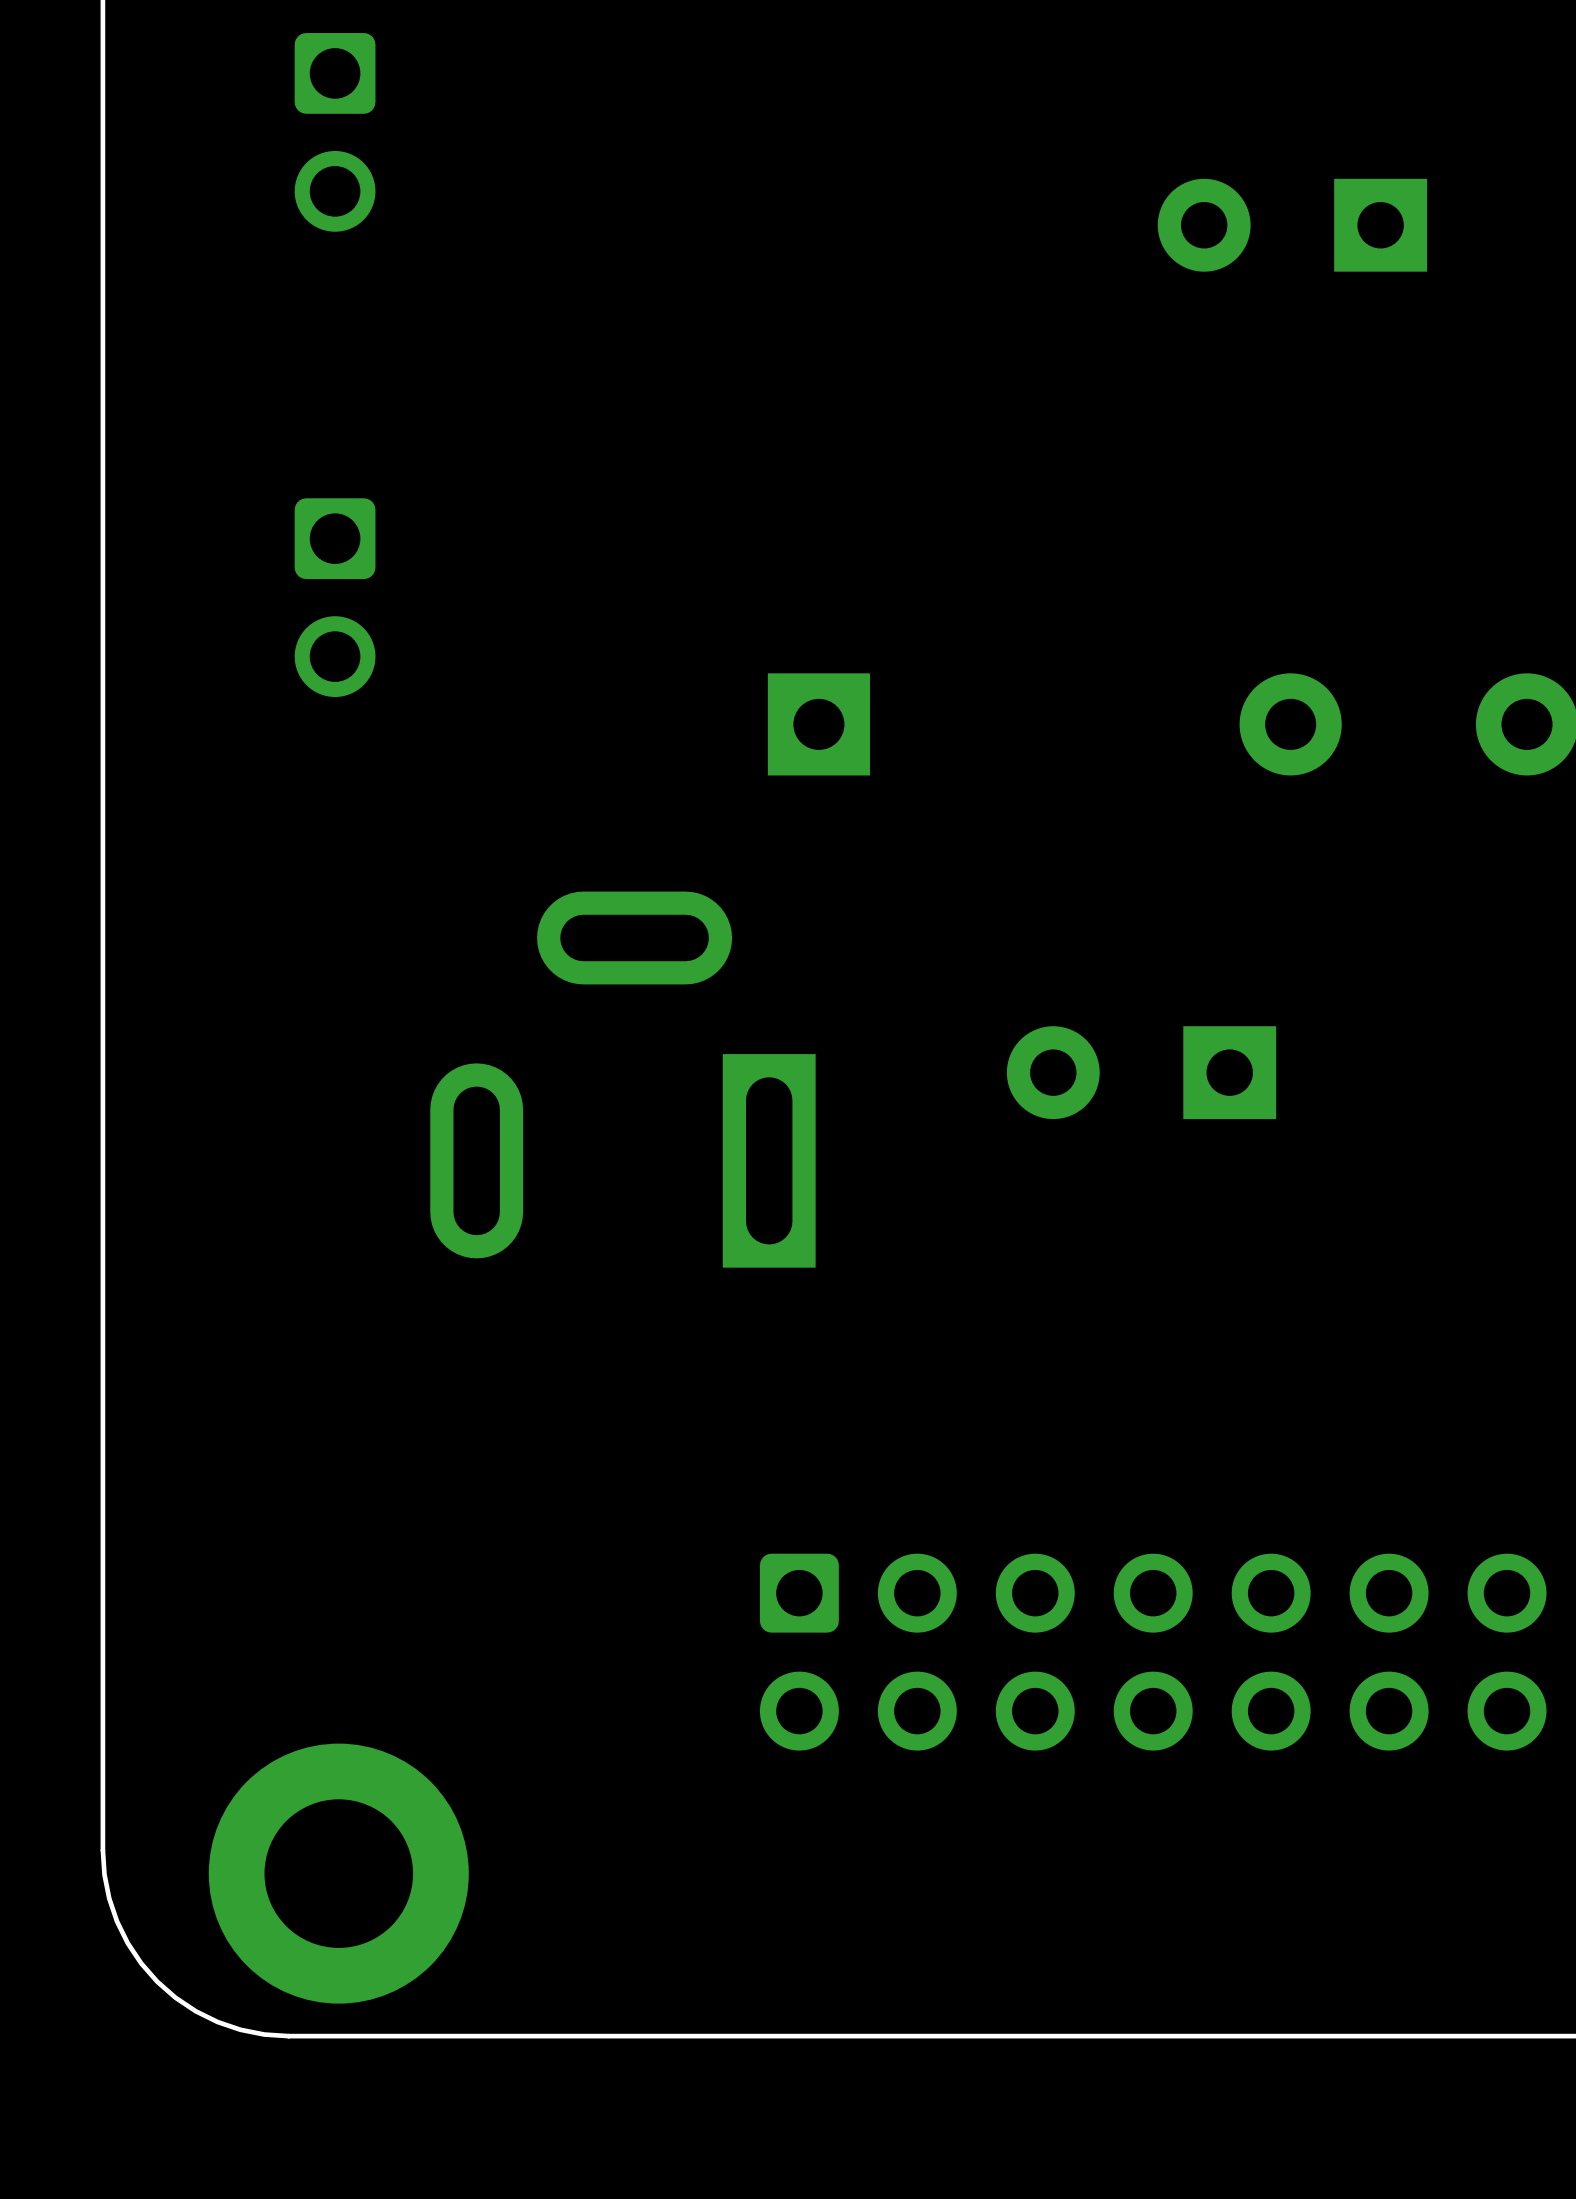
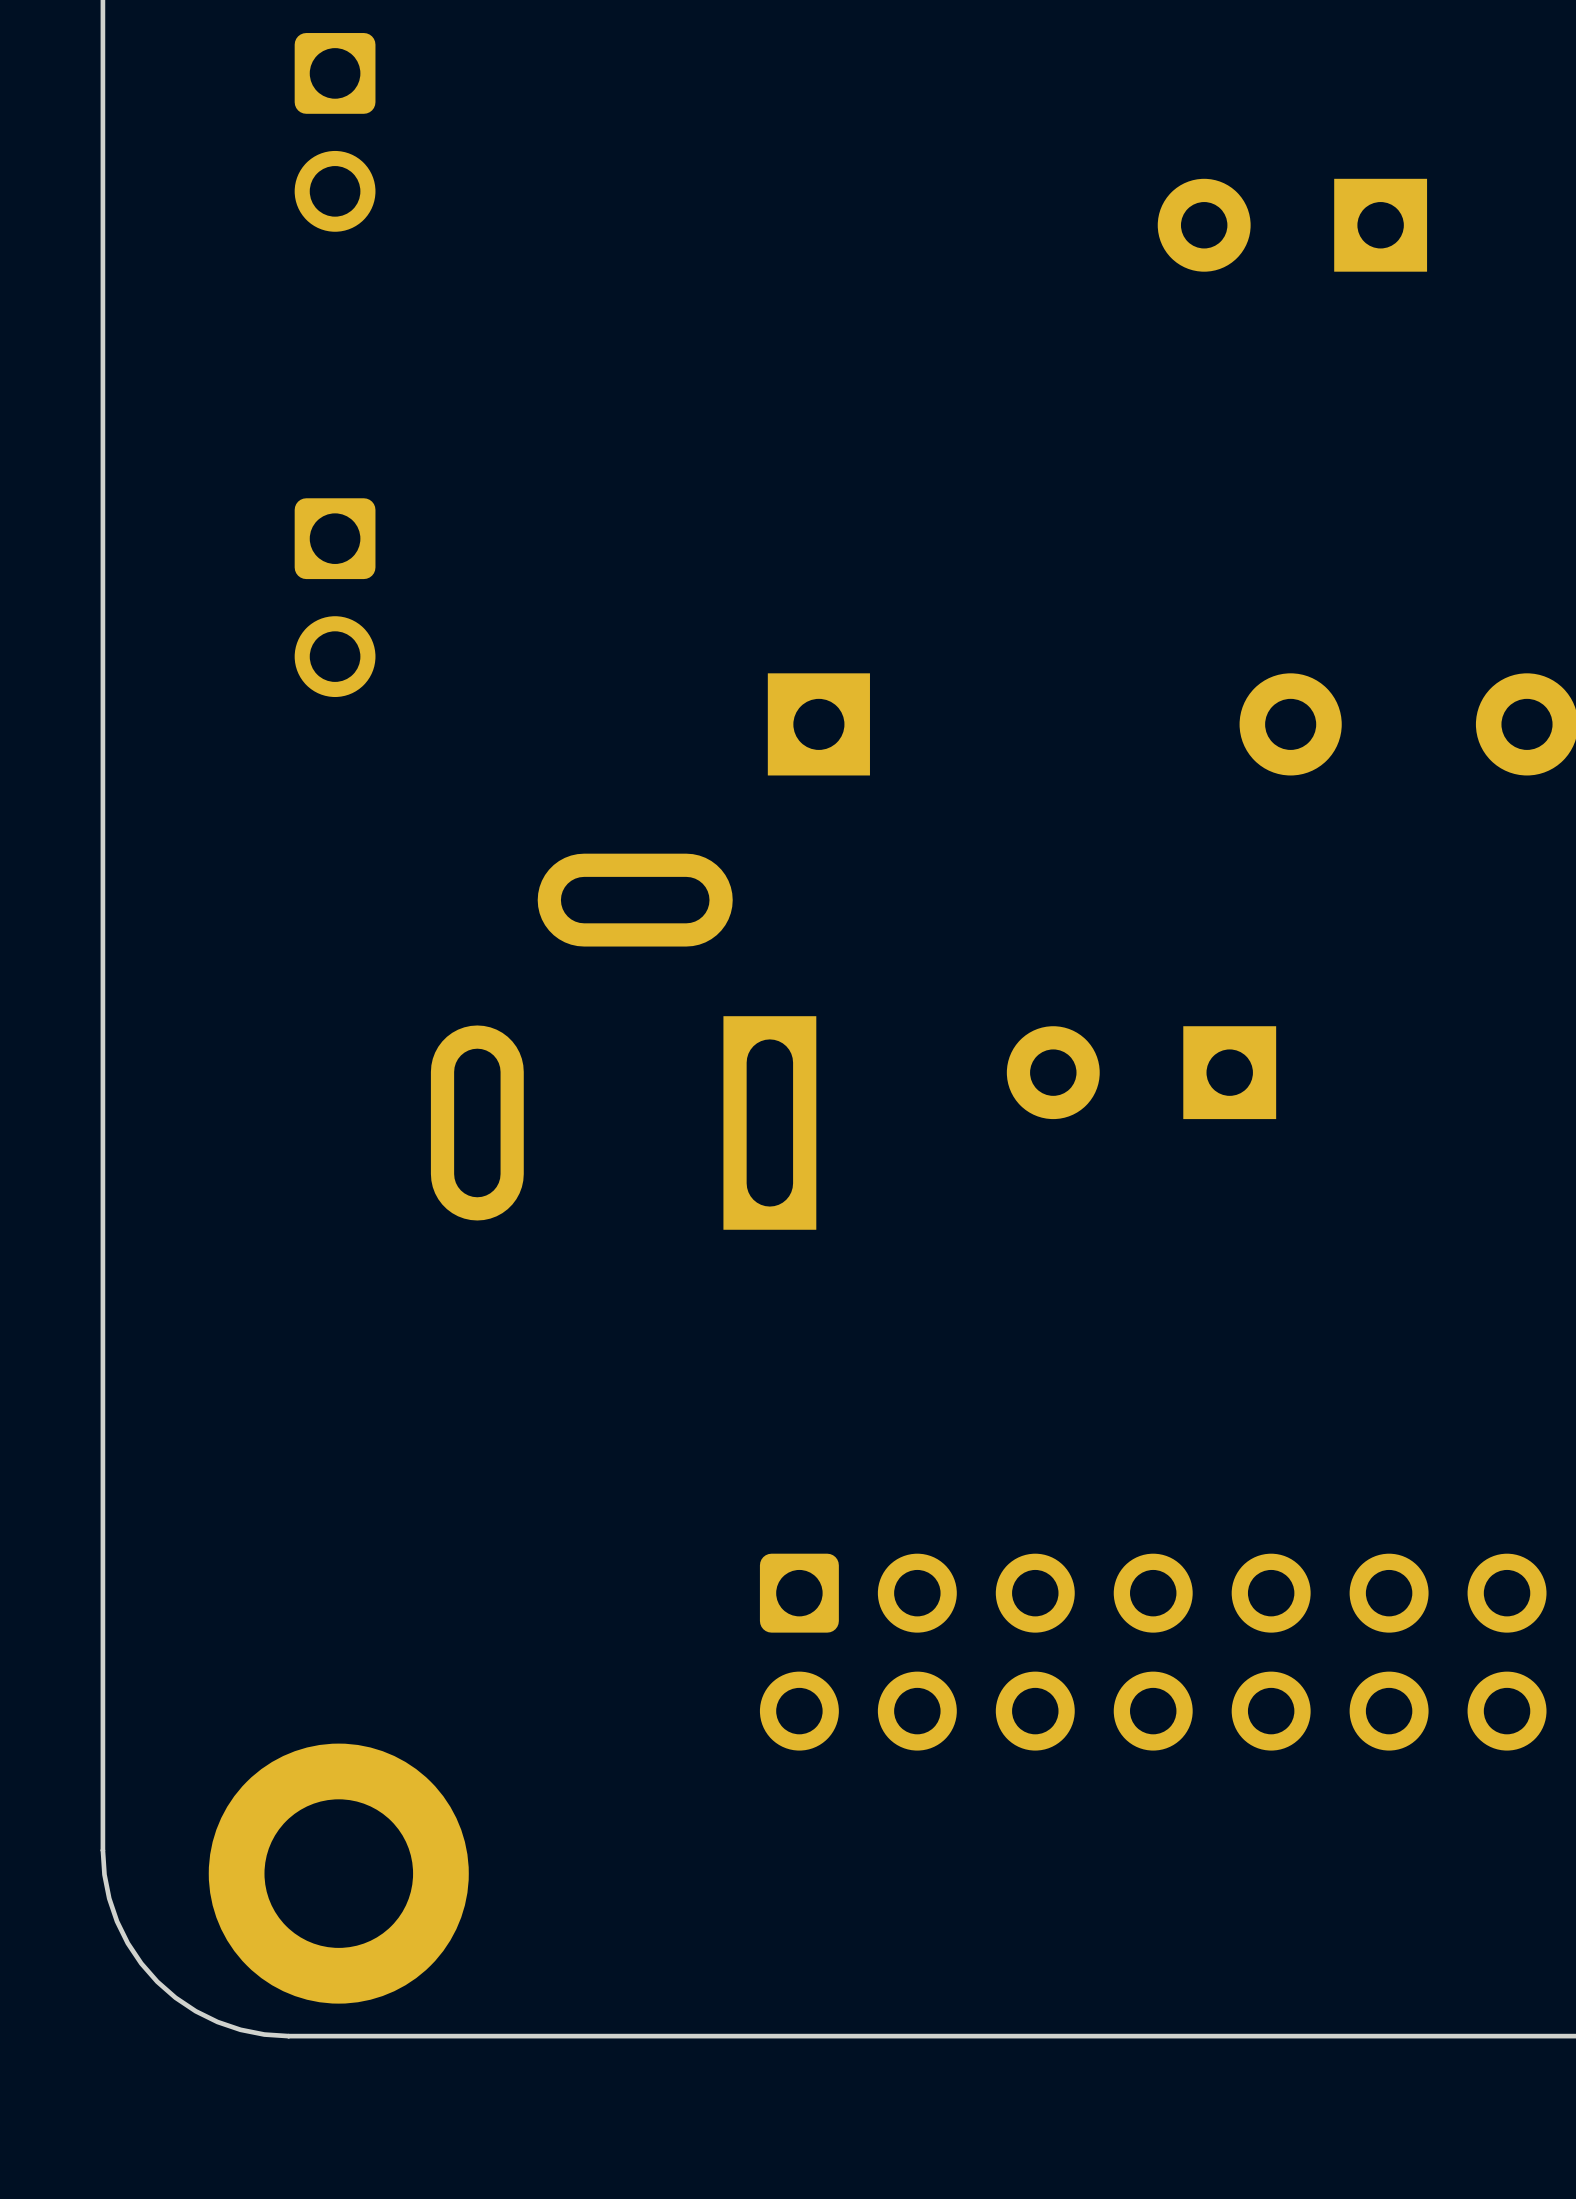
part position: (622, 1079) -> (623, 1041)

